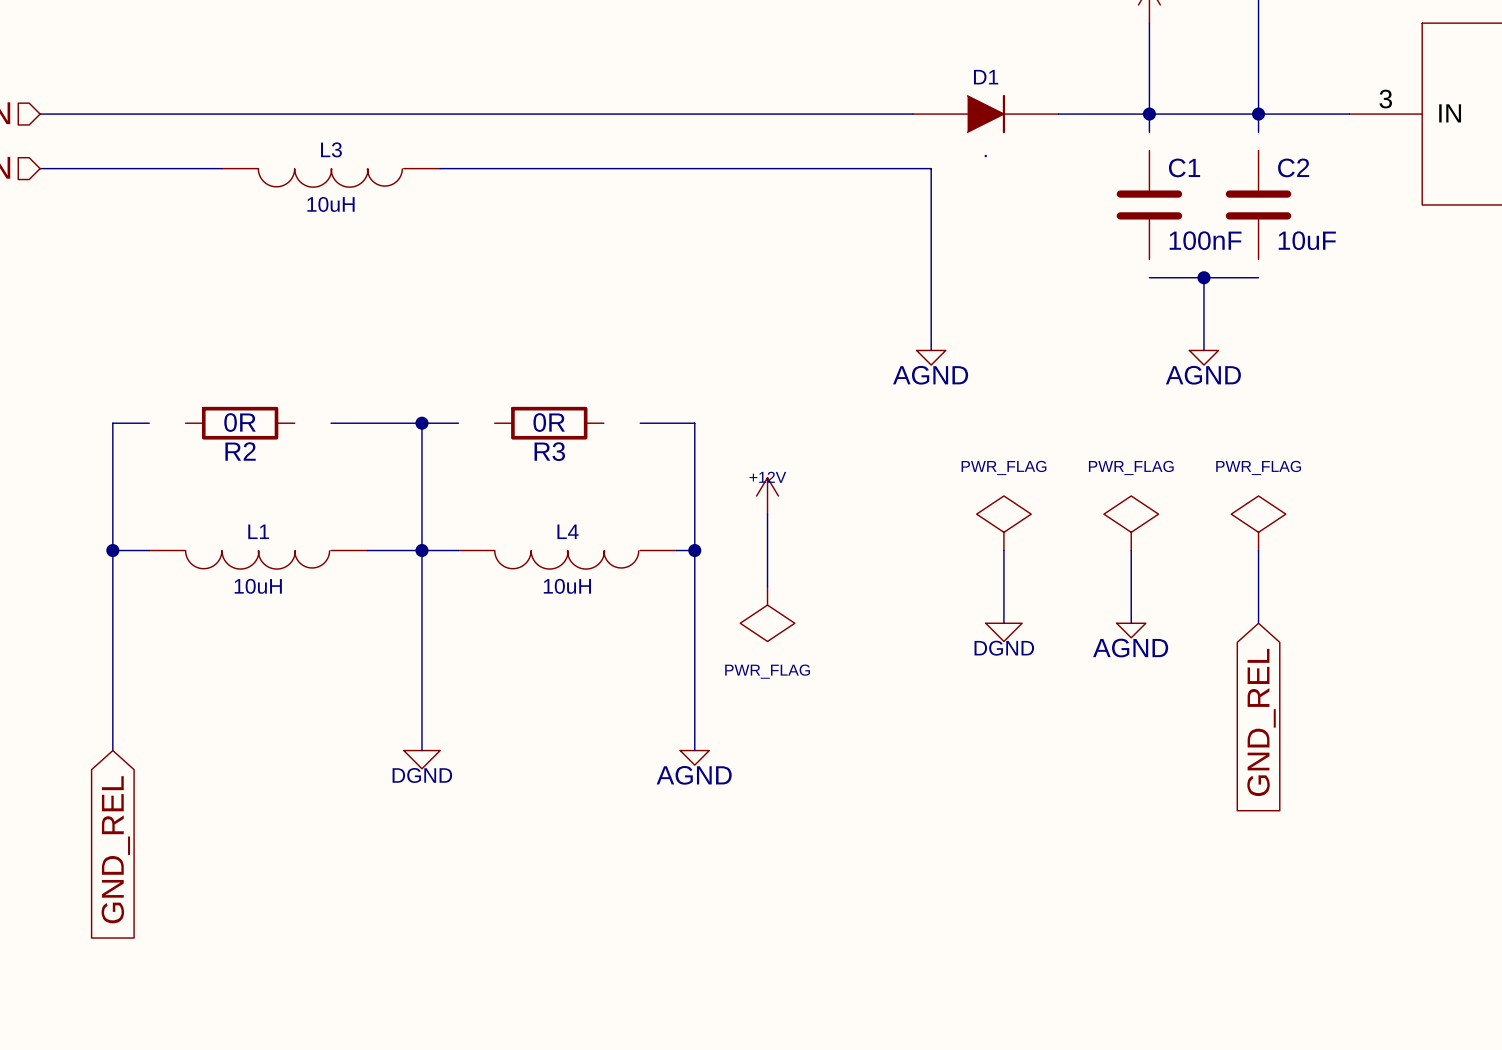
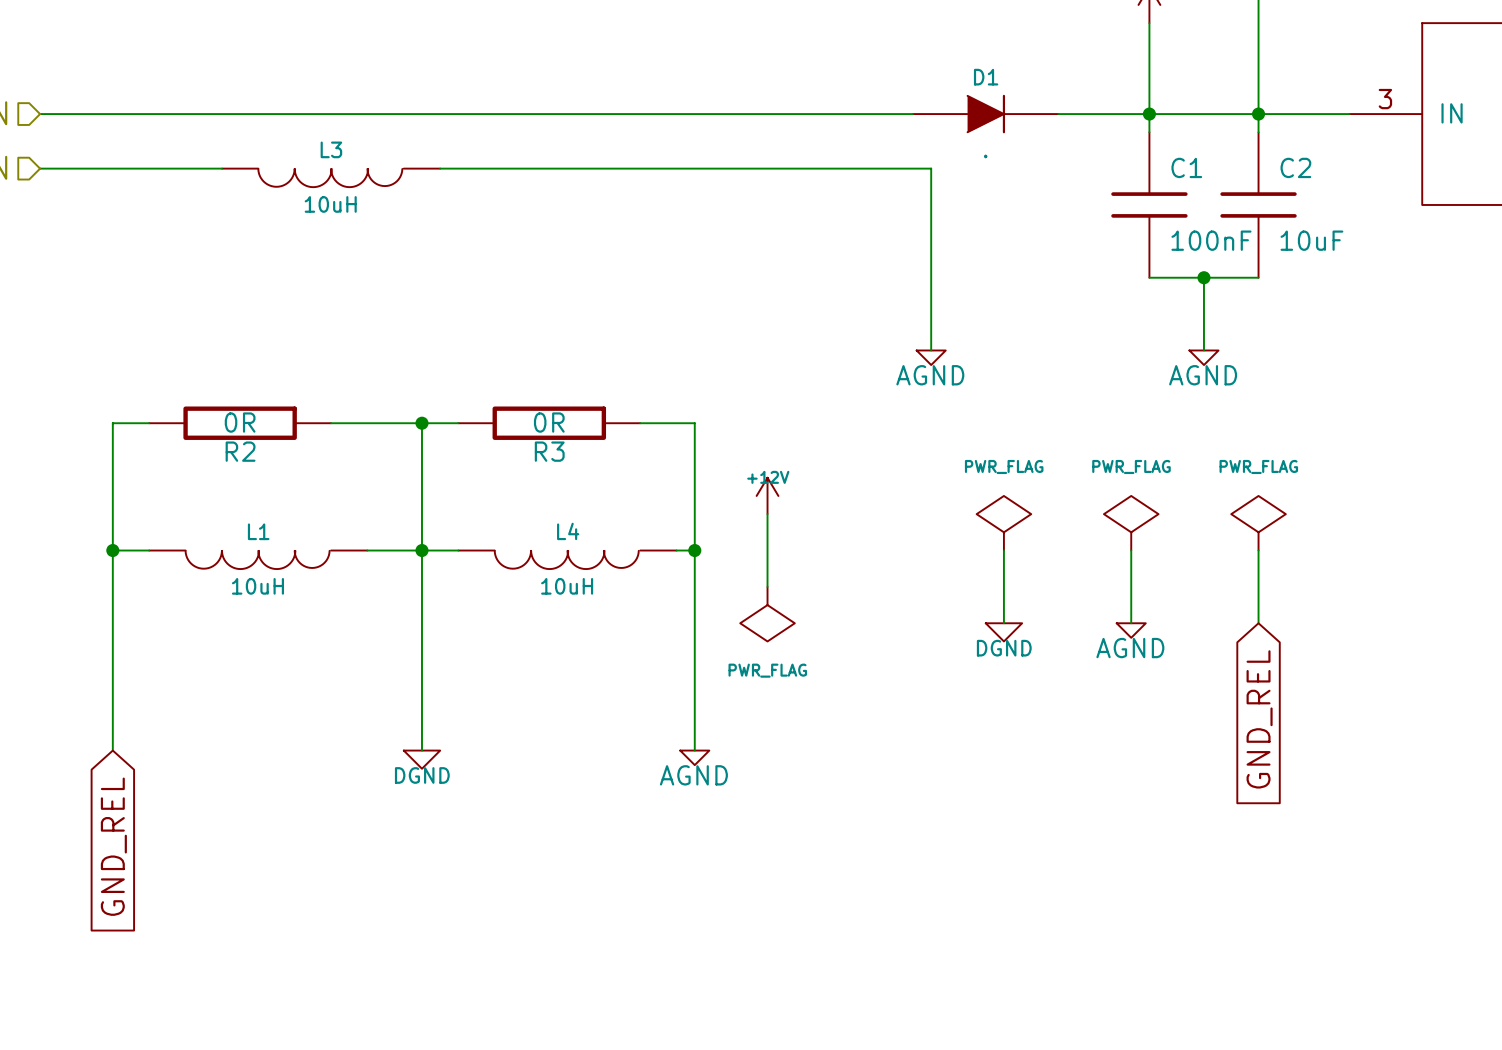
C1 symbol: [1116, 150, 1183, 260] -> [1111, 132, 1188, 278]
C2 symbol: [1225, 150, 1292, 260] -> [1220, 132, 1297, 278]
R2 symbol: [185, 406, 295, 440] -> [149, 406, 332, 440]
R3 symbol: [494, 406, 604, 440] -> [458, 406, 641, 440]

